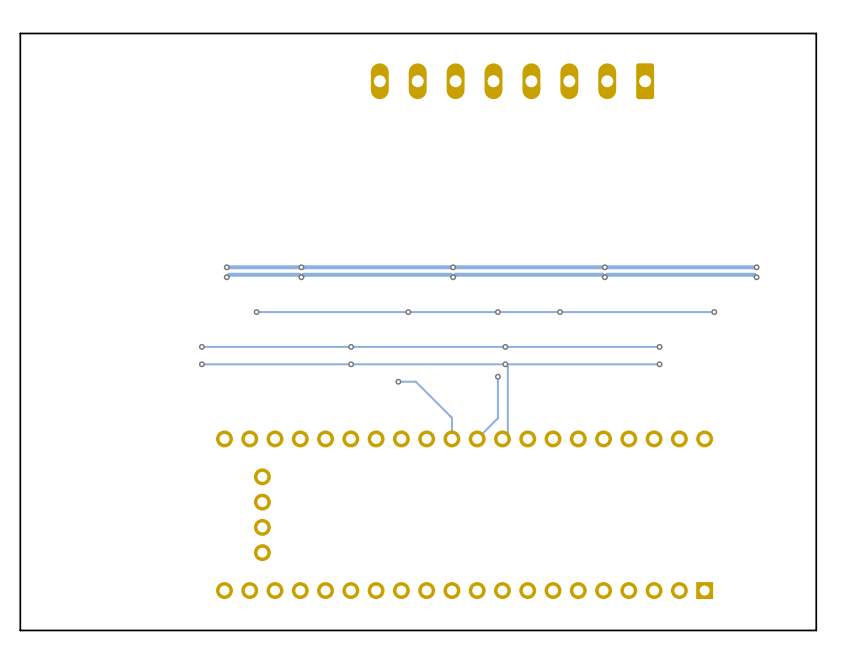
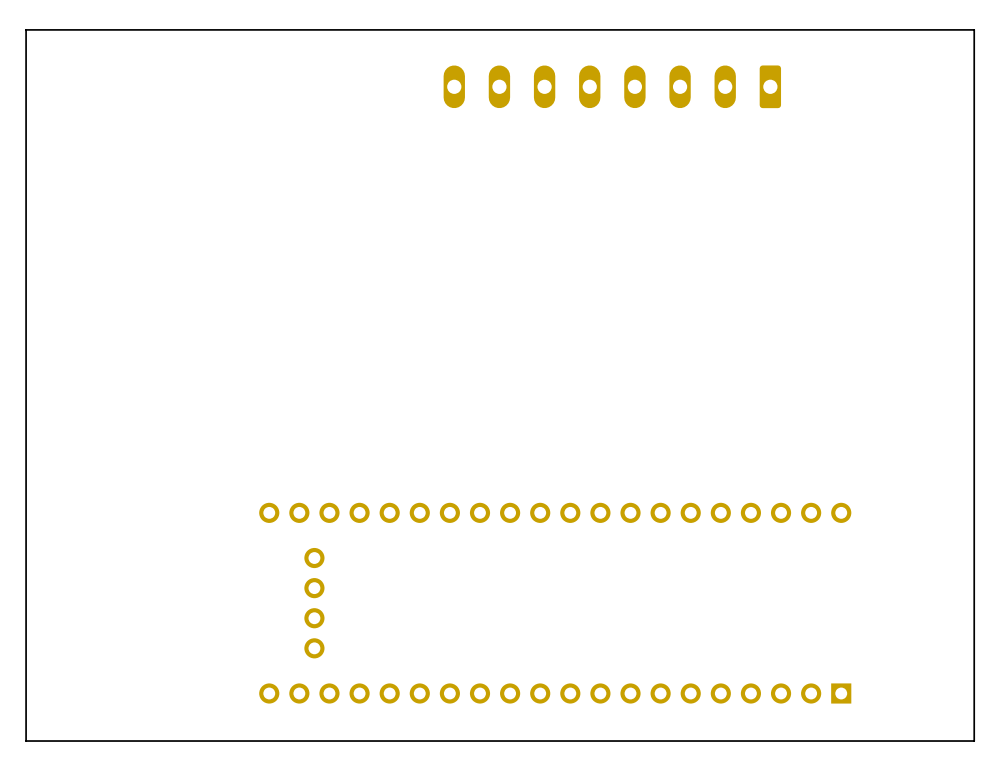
via: (226, 267) -> none
via: (301, 267) -> none
via: (453, 267) -> none
via: (604, 267) -> none
track: (756, 267) (226, 267) -> none
via: (756, 267) -> none
via: (226, 277) -> none
via: (301, 277) -> none
via: (453, 277) -> none
via: (604, 277) -> none
track: (756, 277) (754, 274) (607, 274) (604, 277) (602, 274) (455, 274) (453, 277) (450, 274) (303, 274) (301, 277) (298, 274) (229, 274) (226, 277) -> none
via: (756, 277) -> none
via: (256, 312) -> none
via: (408, 312) -> none
via: (497, 312) -> none
via: (560, 312) -> none
track: (714, 312) (256, 312) -> none
via: (714, 312) -> none
via: (201, 346) -> none
via: (351, 346) -> none
via: (505, 346) -> none
track: (659, 346) (201, 346) -> none
via: (659, 346) -> none
via: (201, 364) -> none
via: (351, 364) -> none
track: (505, 364) (507, 366) (507, 433) (502, 438) -> none
via: (505, 364) -> none
track: (659, 364) (201, 364) -> none
via: (659, 364) -> none
track: (497, 376) (497, 418) (477, 438) -> none
via: (497, 376) -> none
track: (398, 381) (415, 381) (451, 417) (451, 438) -> none
via: (398, 381) -> none

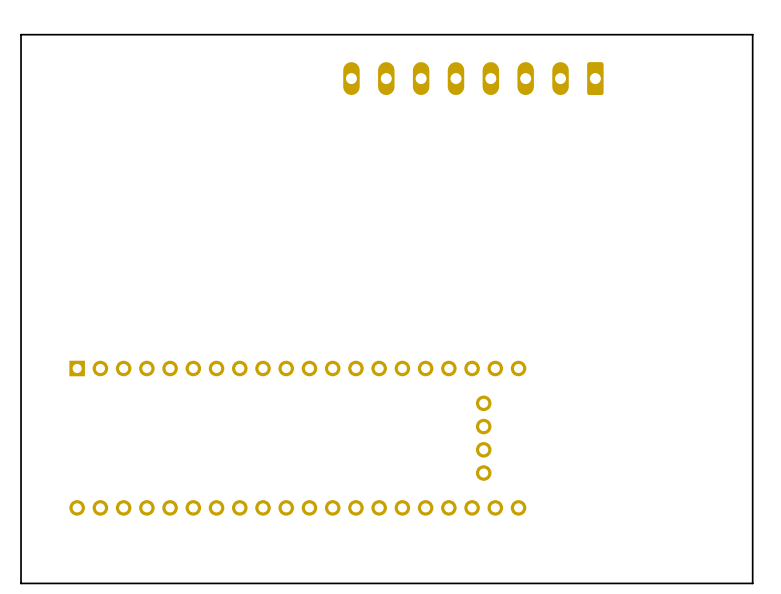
part rotation: 0° (555, 603) -> 180° (297, 438)

